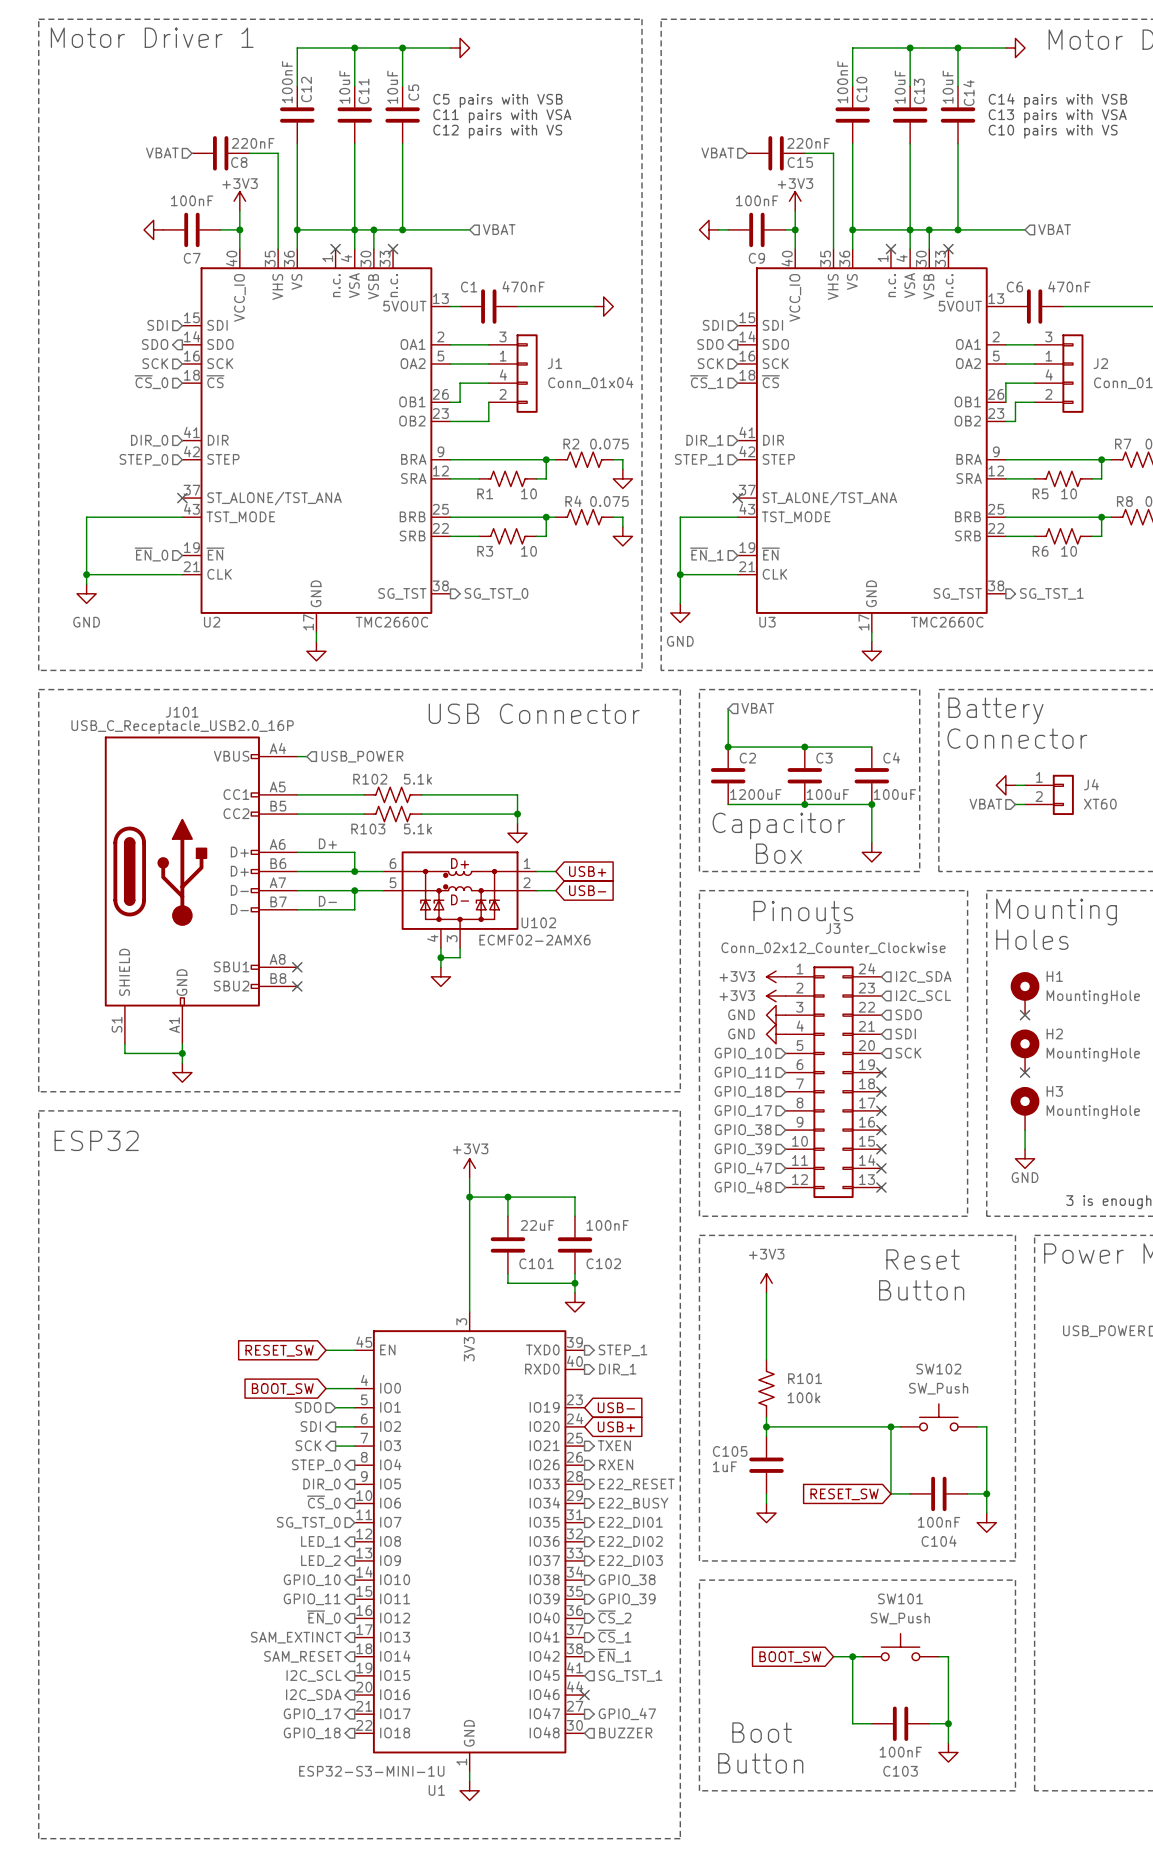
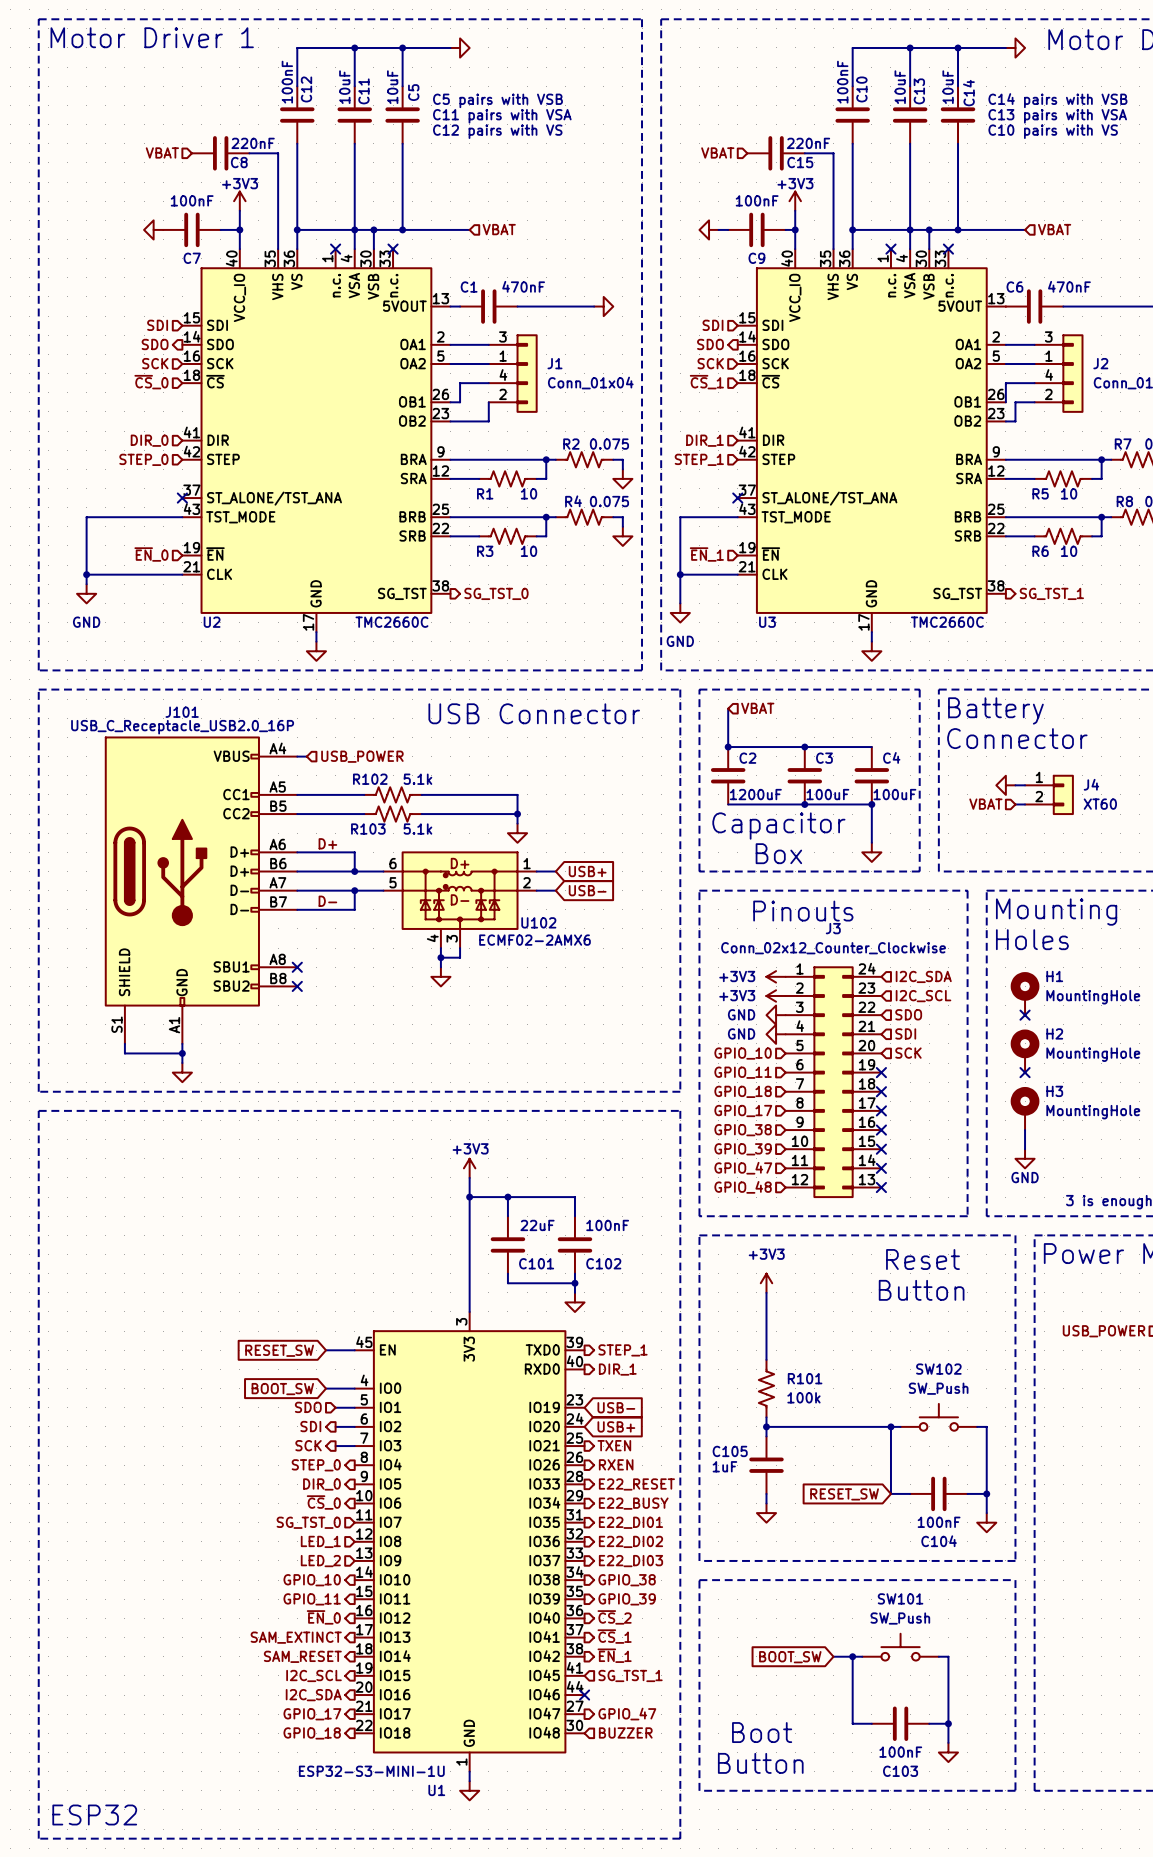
text: ESP32 (96, 1140) -> none
hierarchical label shape: output (320, 1541) -> input (320, 1541)
hierarchical label shape: output (320, 1561) -> input (320, 1561)
text: none -> ESP32 (94, 1814)

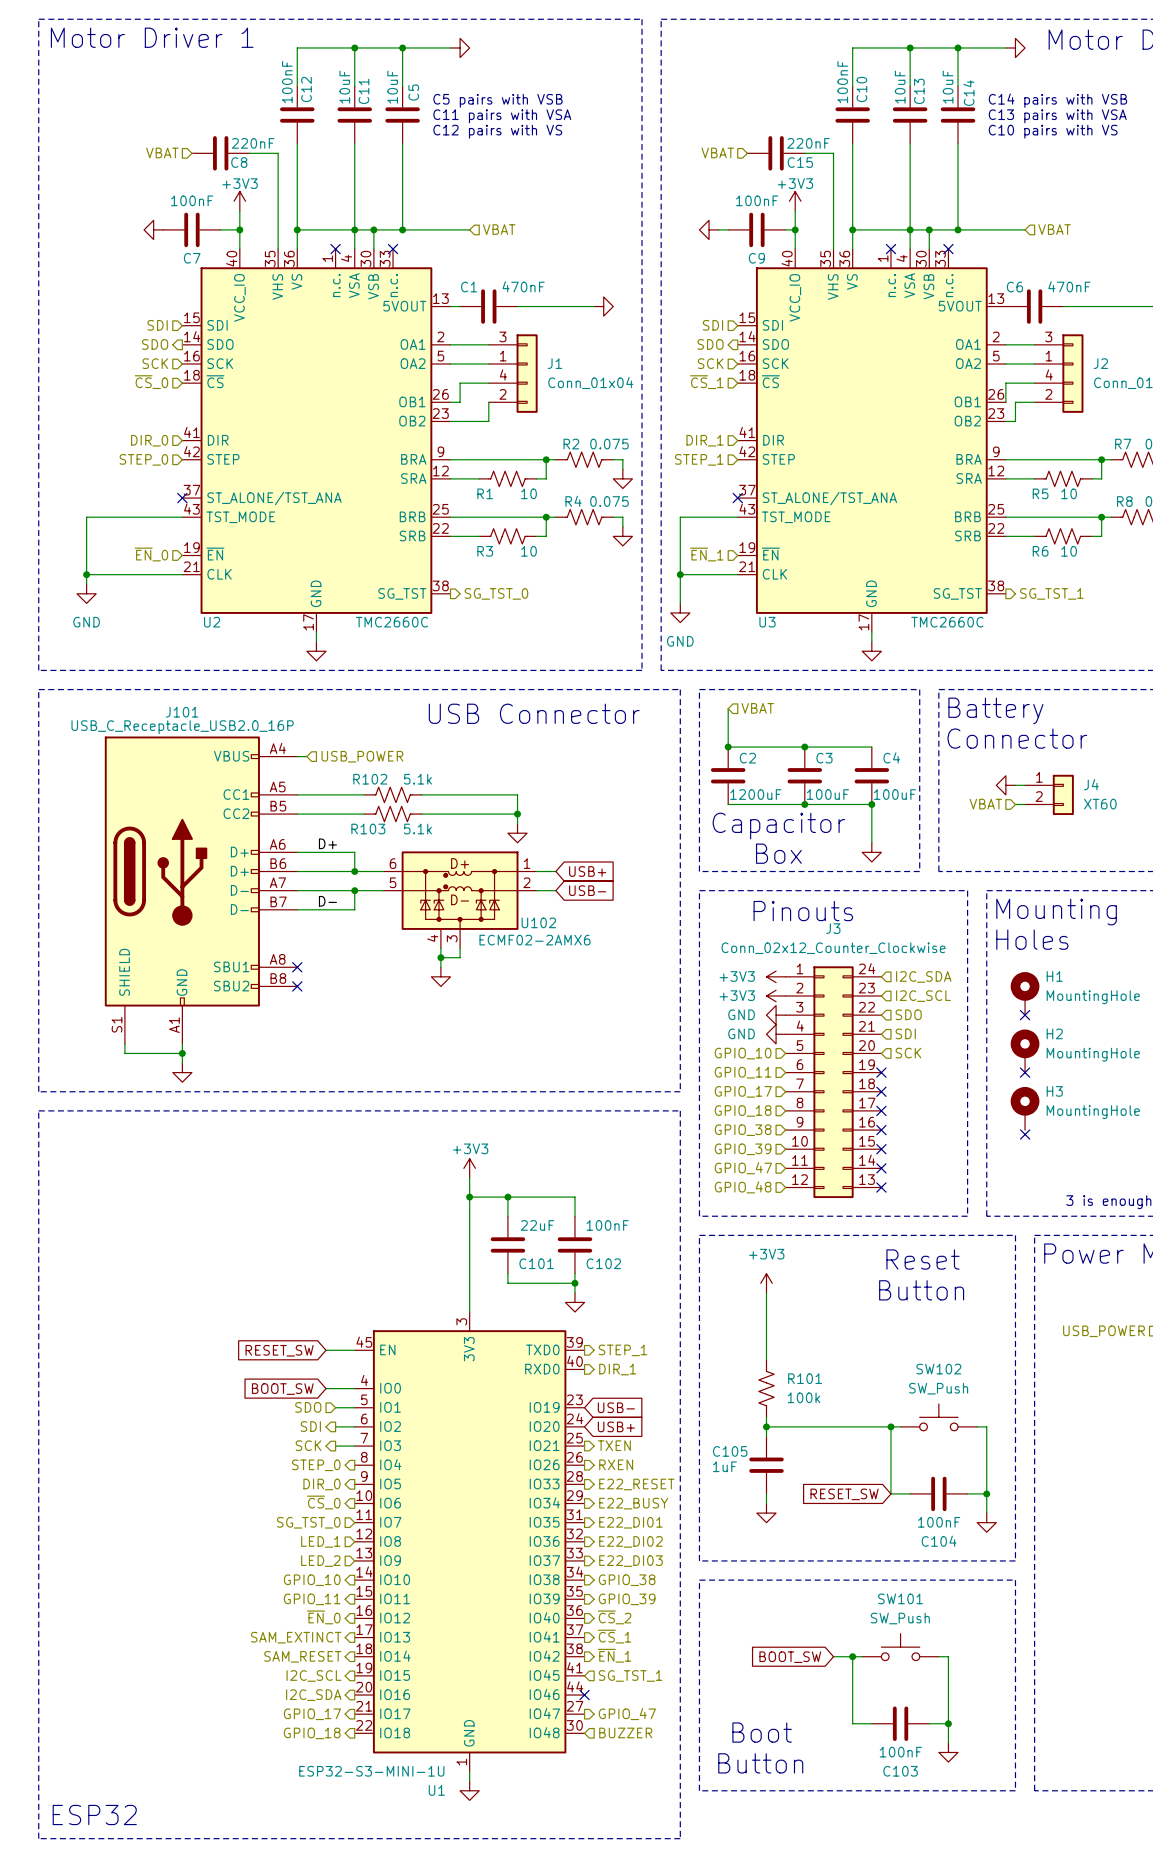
hierarchical label: GPIO_18 (743, 1091) -> GPIO_17 (743, 1091)
hierarchical label: GPIO_17 (743, 1111) -> GPIO_18 (743, 1111)
wire: (1025, 1130) (1025, 1149) -> none
no-connect mark: none -> (1025, 1134)
power symbol: GND (1025, 1158) -> none

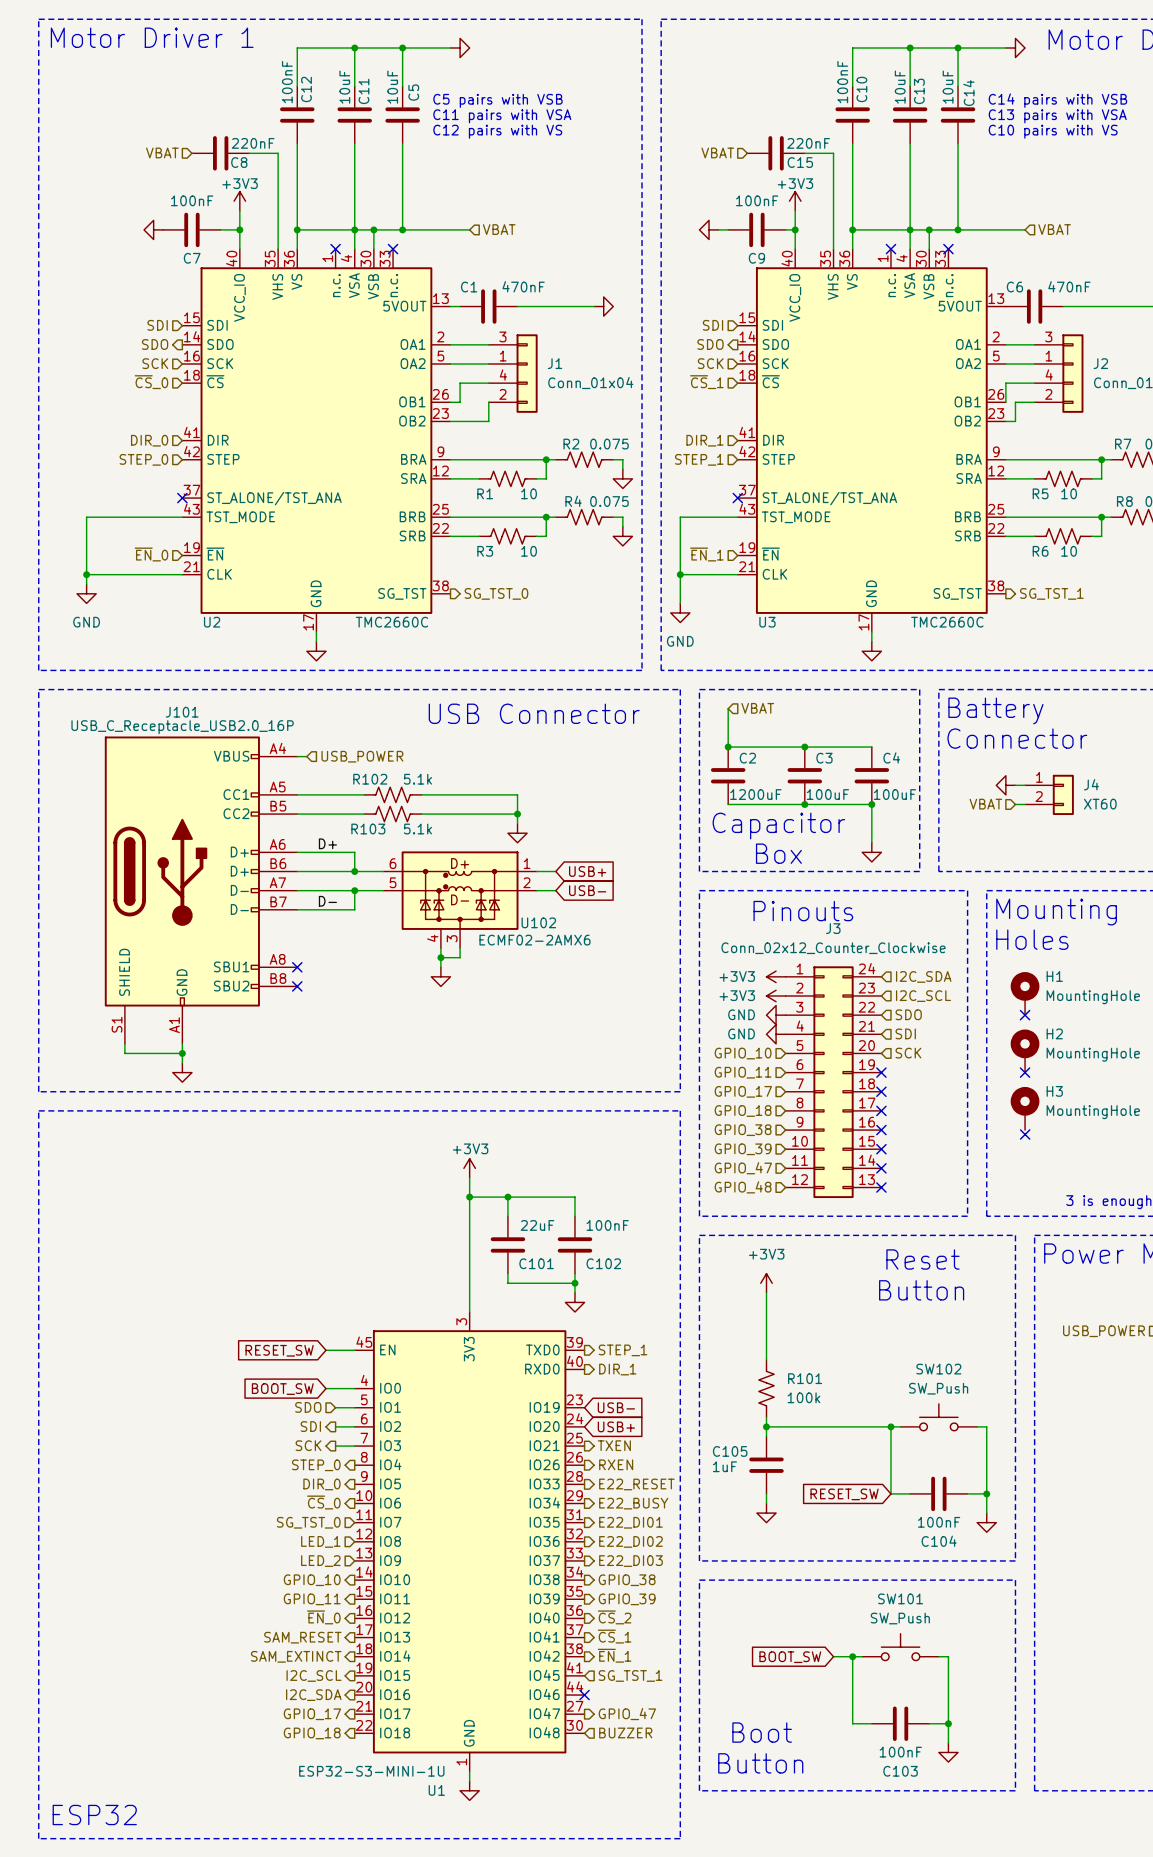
hierarchical label: SAM_EXTINCT (296, 1637) -> SAM_RESET (302, 1637)
hierarchical label: SAM_RESET (302, 1656) -> SAM_EXTINCT (296, 1656)

